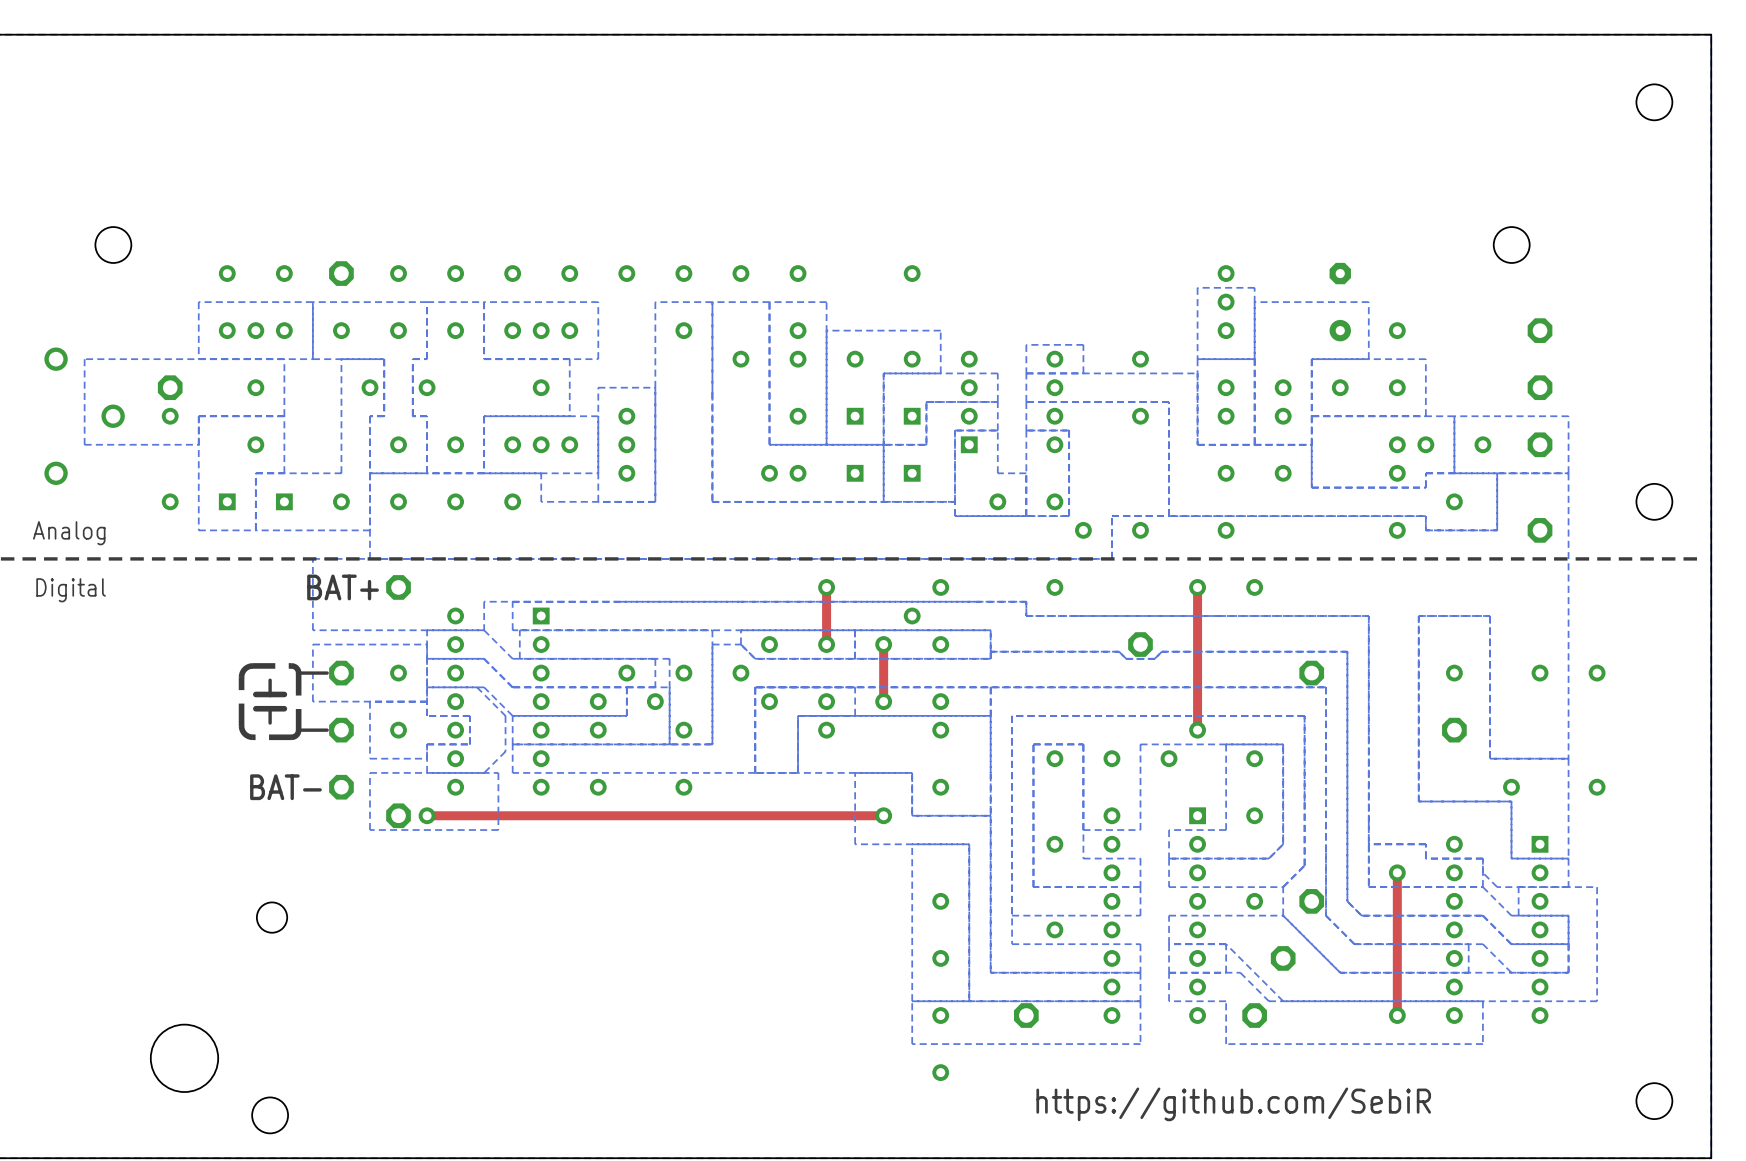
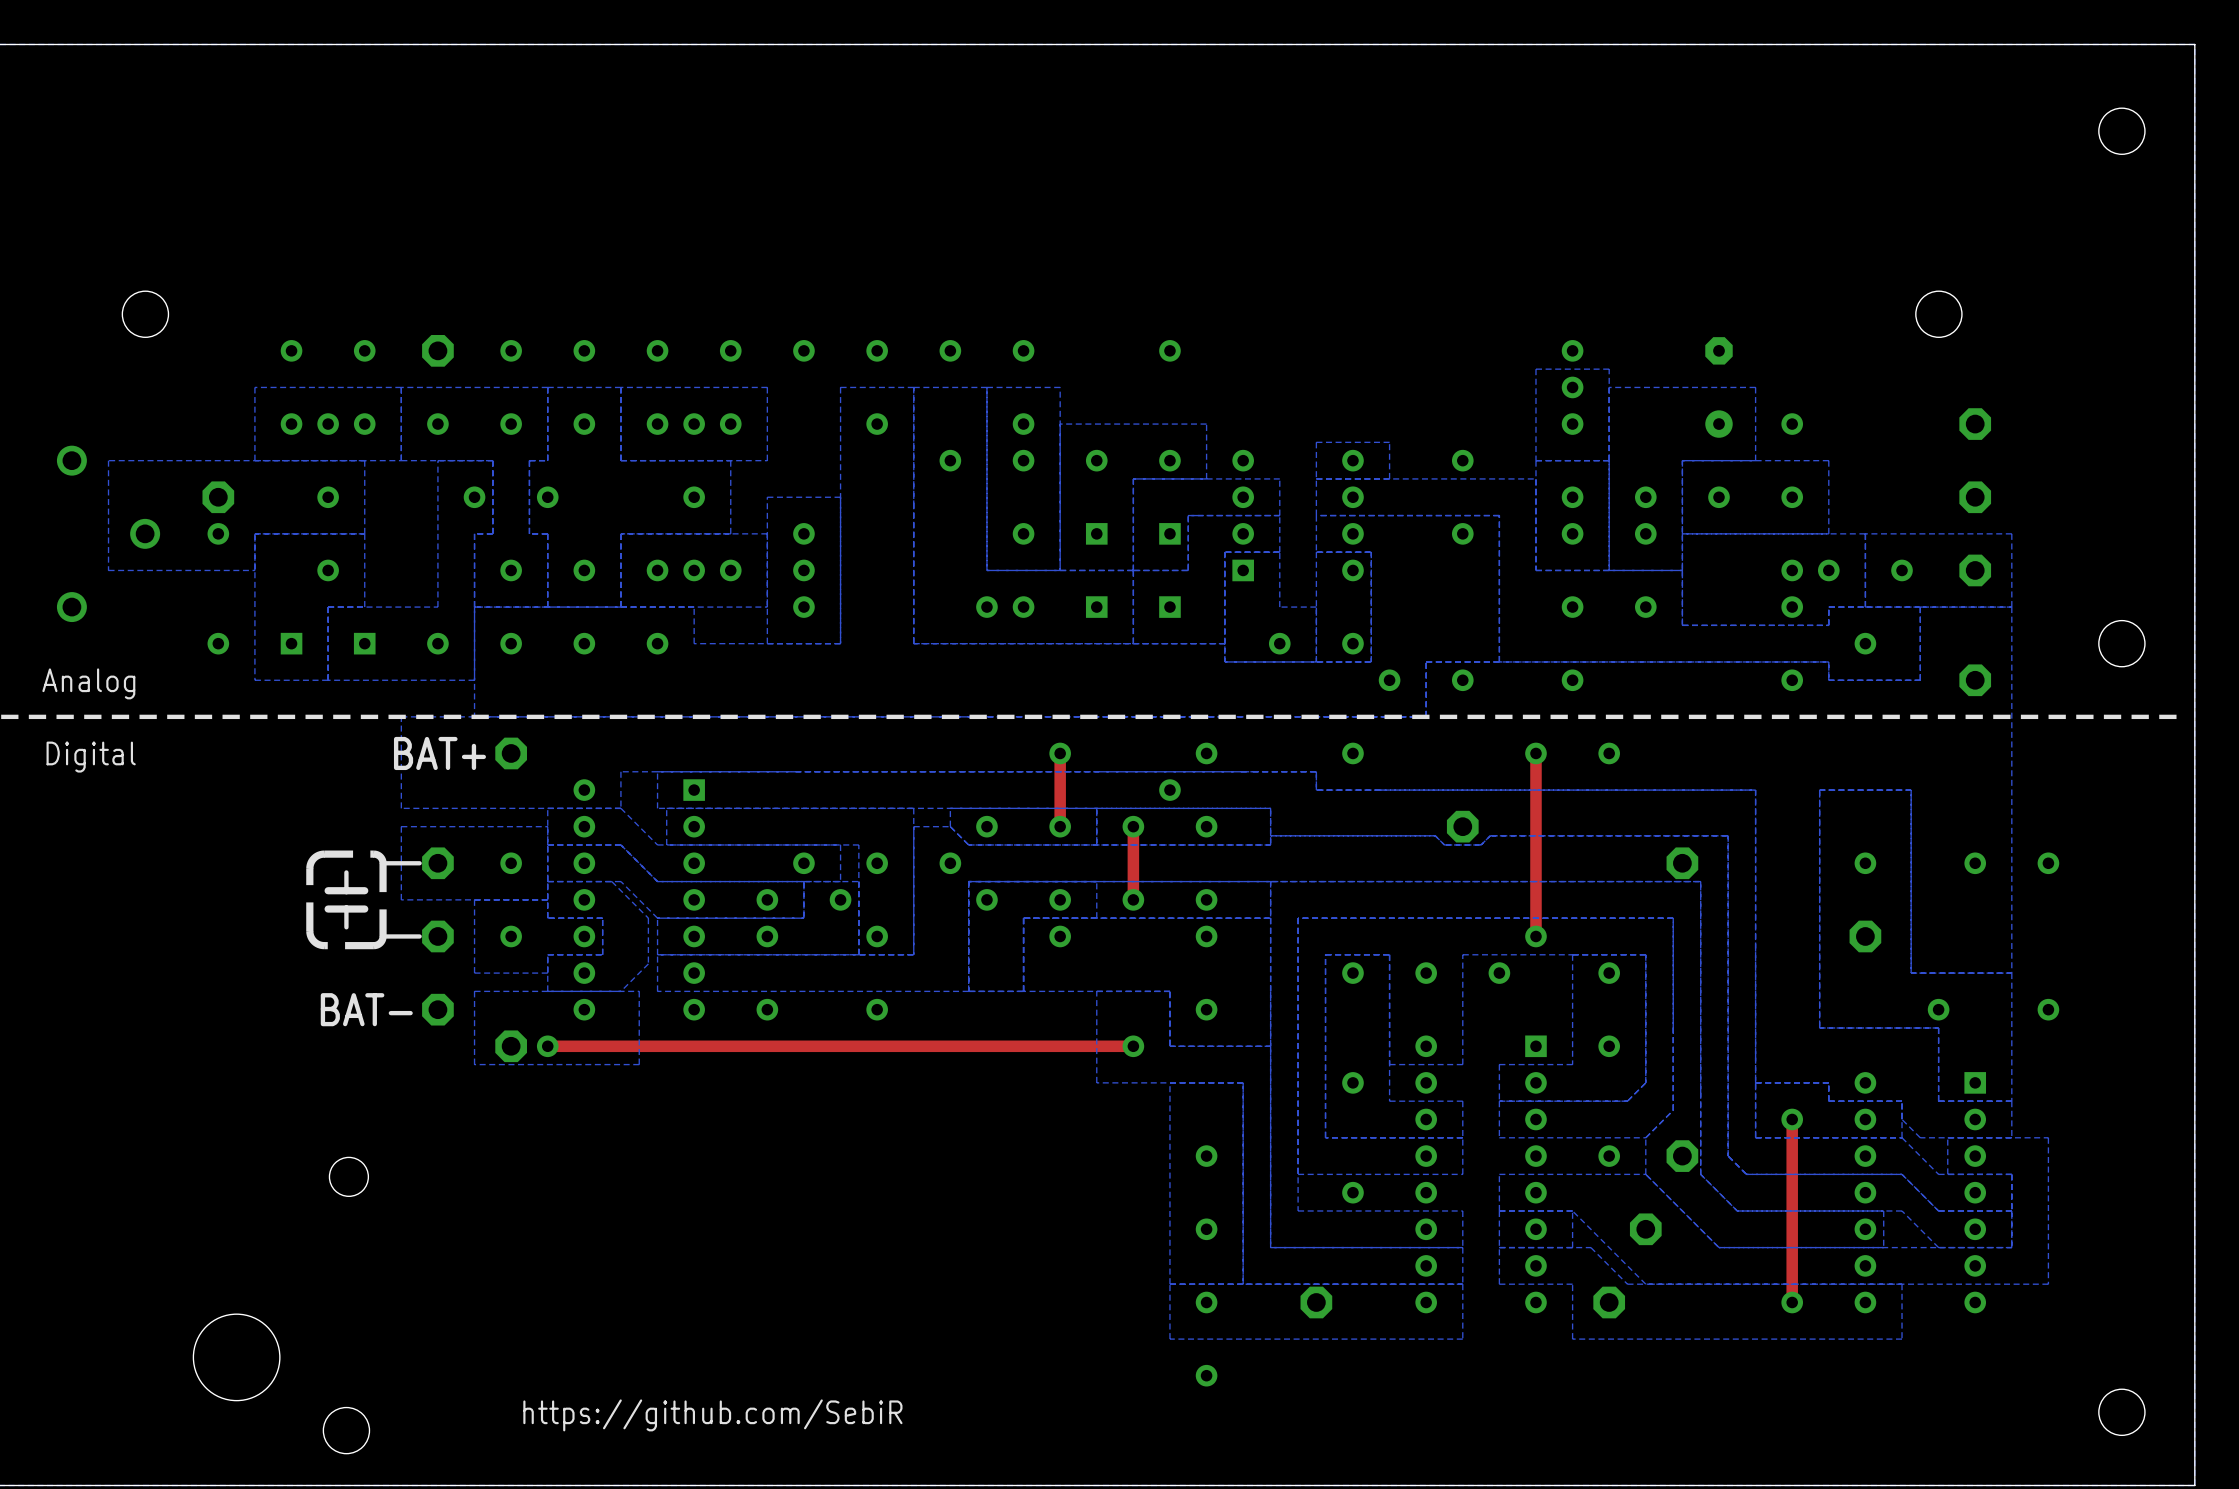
text: none -> https://github.com/SebiR (712, 1415)
text: https://github.com/SebiR (1233, 1104) -> none

